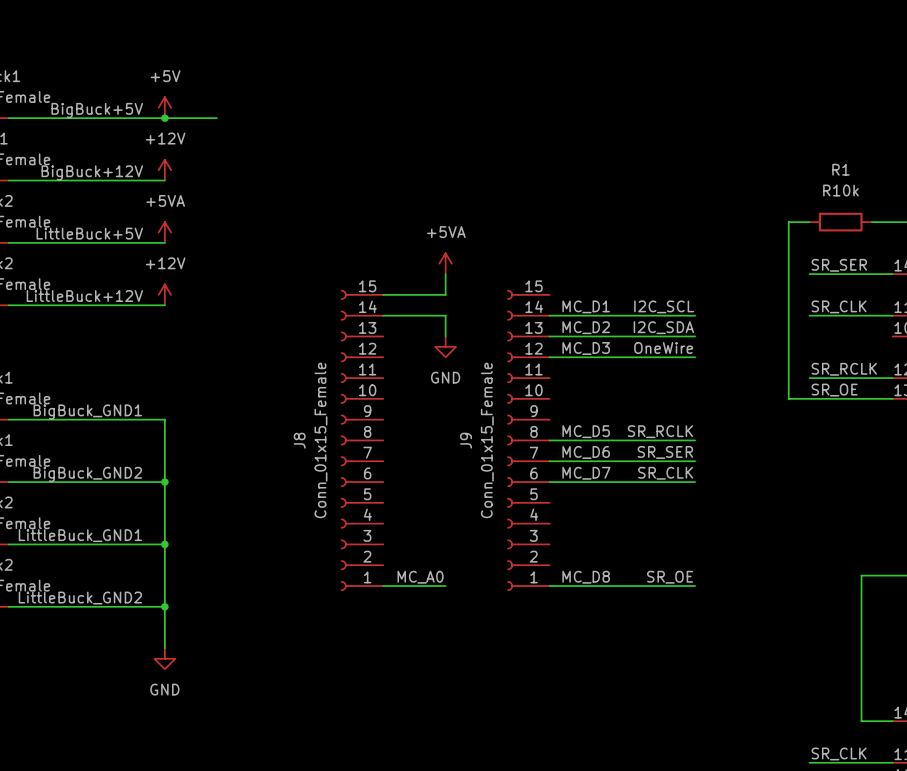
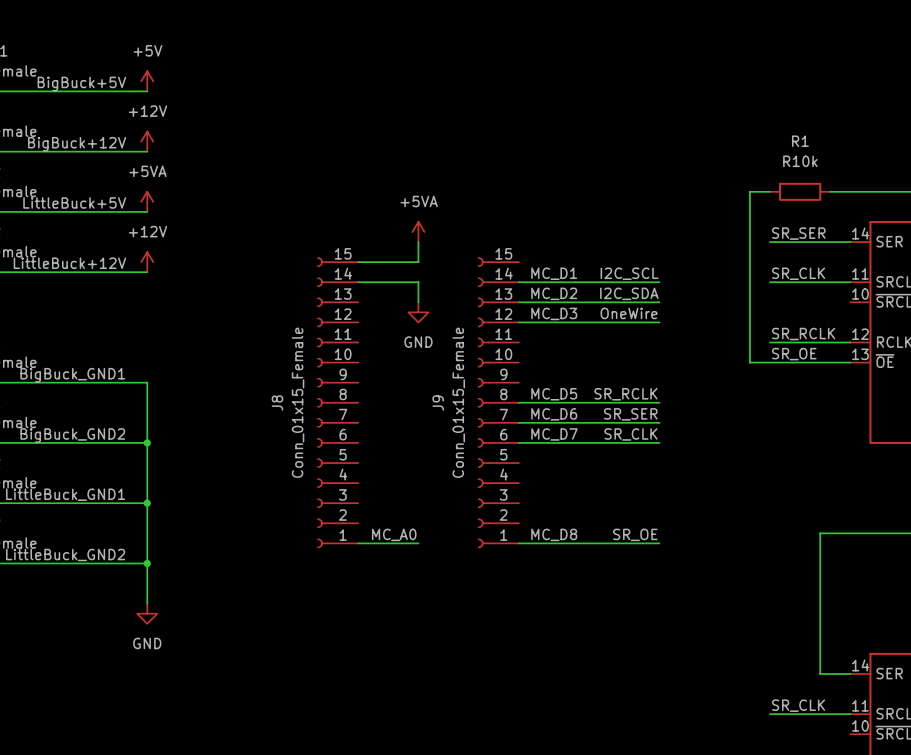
wire: (164, 118) (216, 118) -> none
junction: (164, 118) -> none

